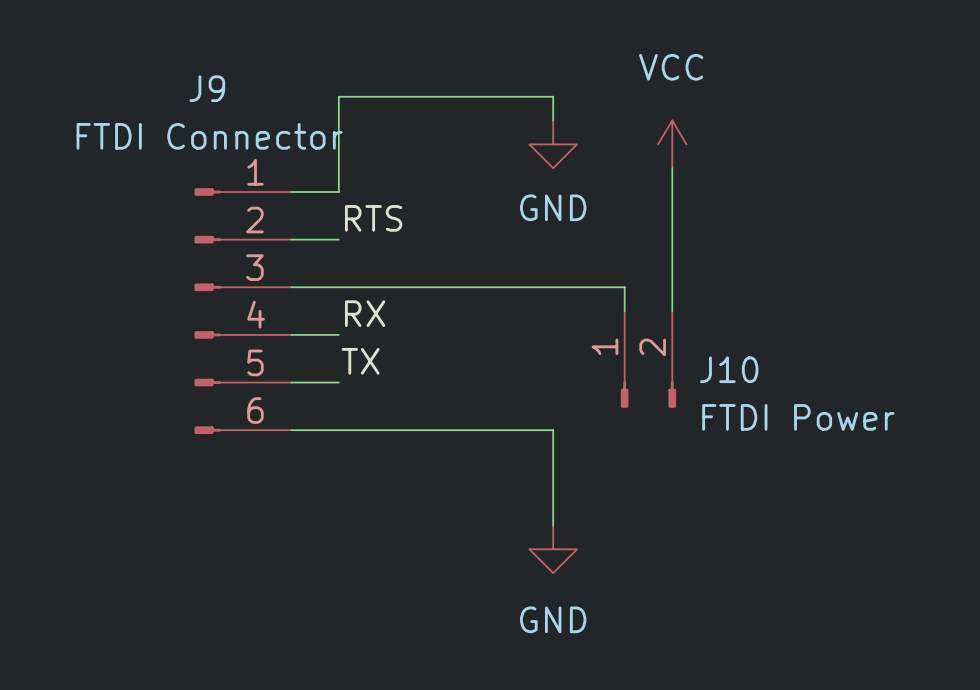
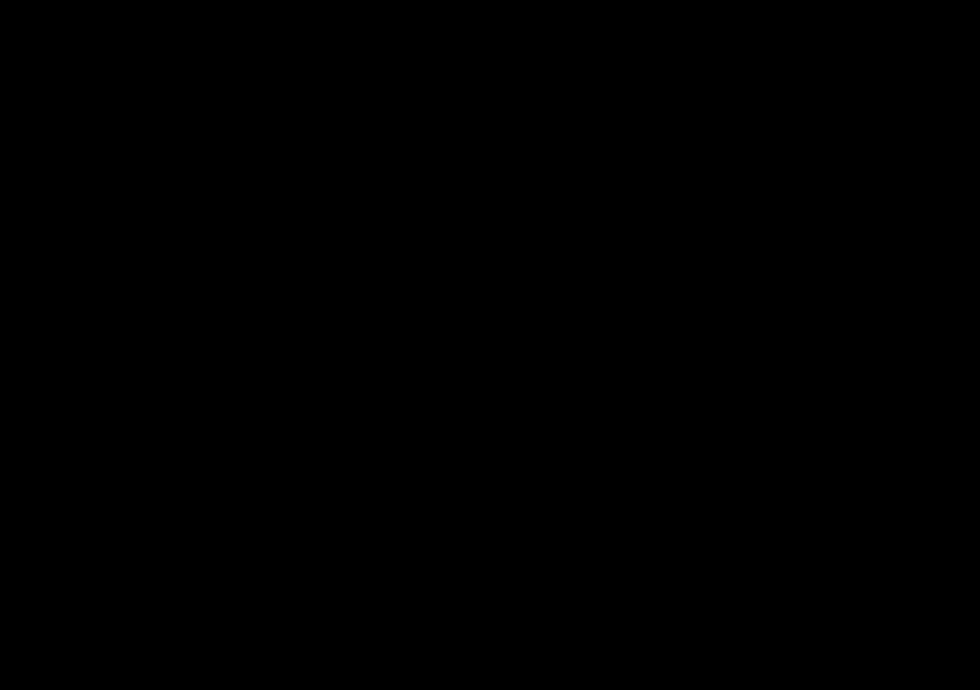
wire: (553, 120) (553, 96) (338, 96) (338, 192) (291, 192) -> none
power symbol: GND (553, 144) -> none
power symbol: VCC (672, 144) -> none
wire: (672, 168) (672, 311) -> none
label: RTS (373, 218) -> none
wire: (291, 239) (338, 239) -> none
wire: (291, 287) (624, 287) (624, 311) -> none
J9: FTDI Connector (242, 311) -> none
label: RX (365, 313) -> none
wire: (291, 334) (338, 334) -> none
J10: FTDI Power (648, 359) -> none
label: TX (360, 361) -> none
wire: (291, 382) (338, 382) -> none
wire: (291, 430) (553, 430) (553, 525) -> none
power symbol: GND (553, 549) -> none

